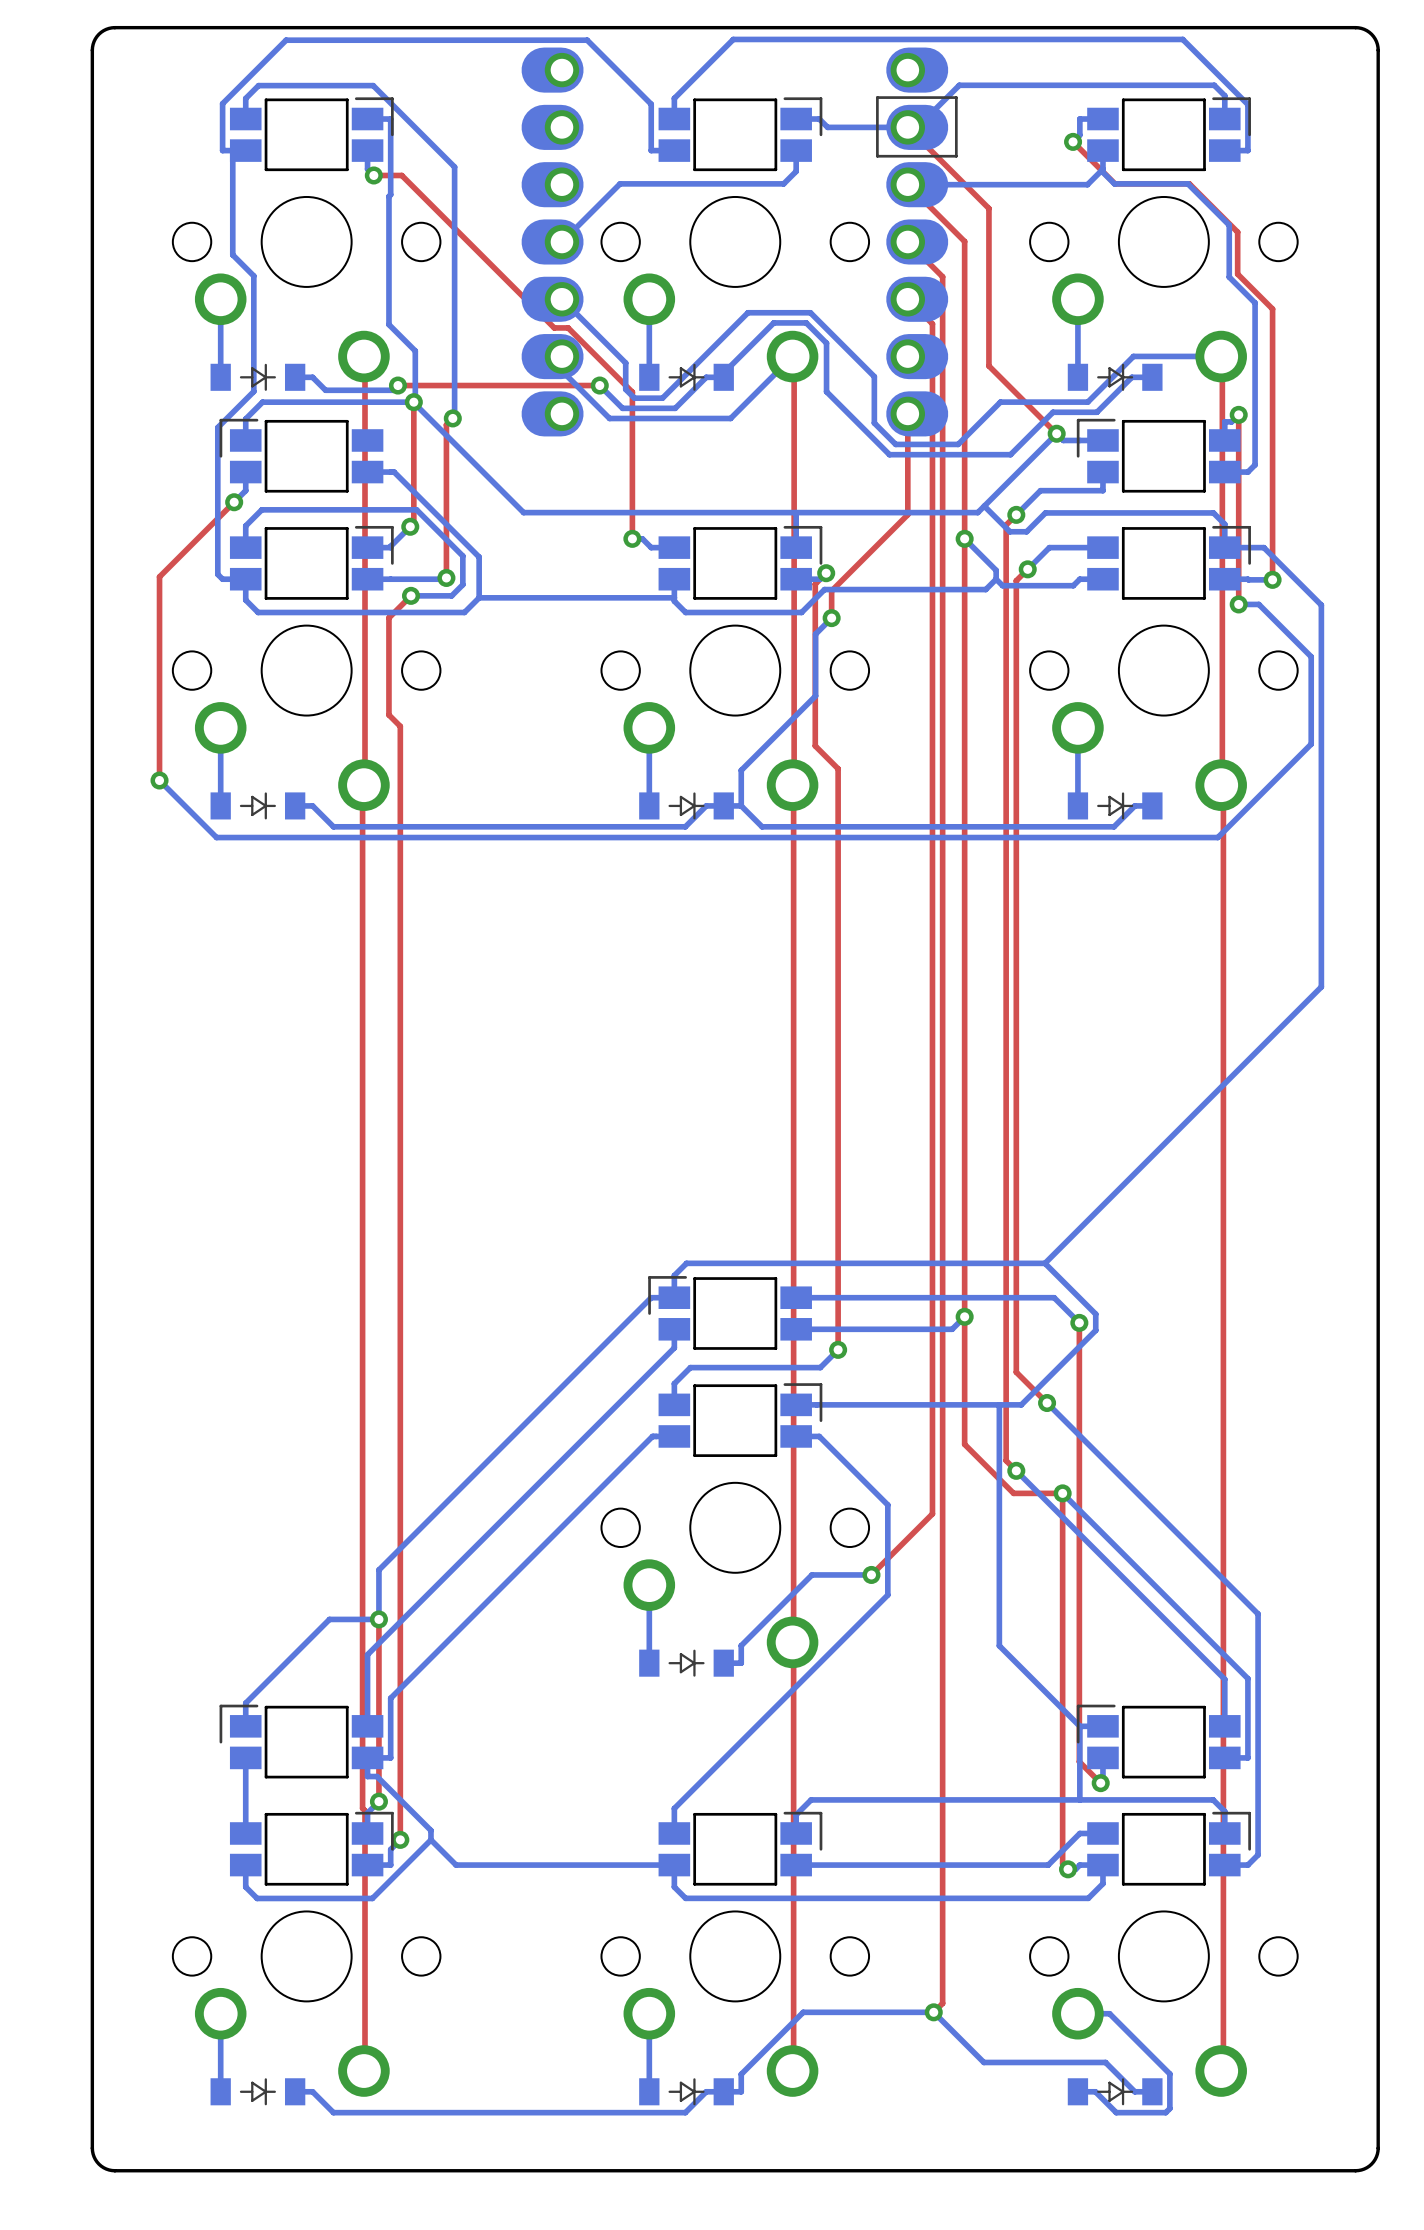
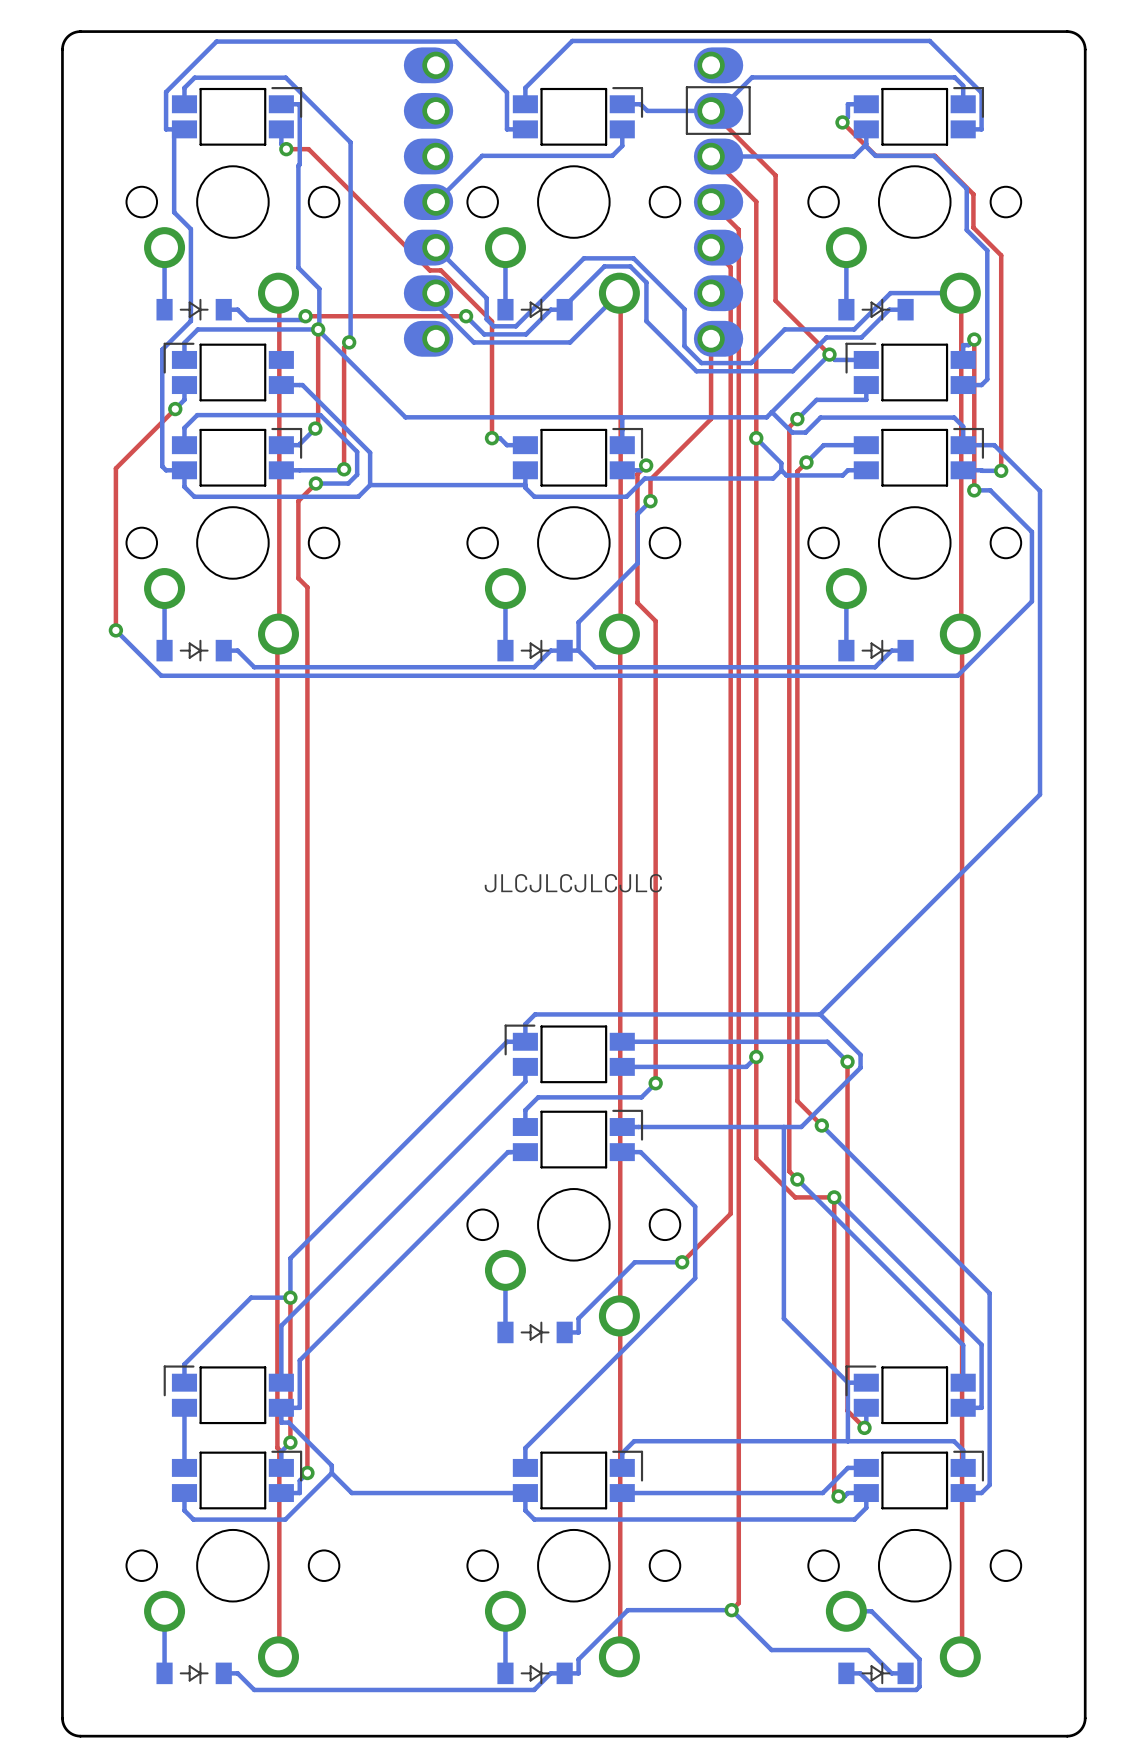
text: none -> JLCJLCJLCJLC (573, 883)

